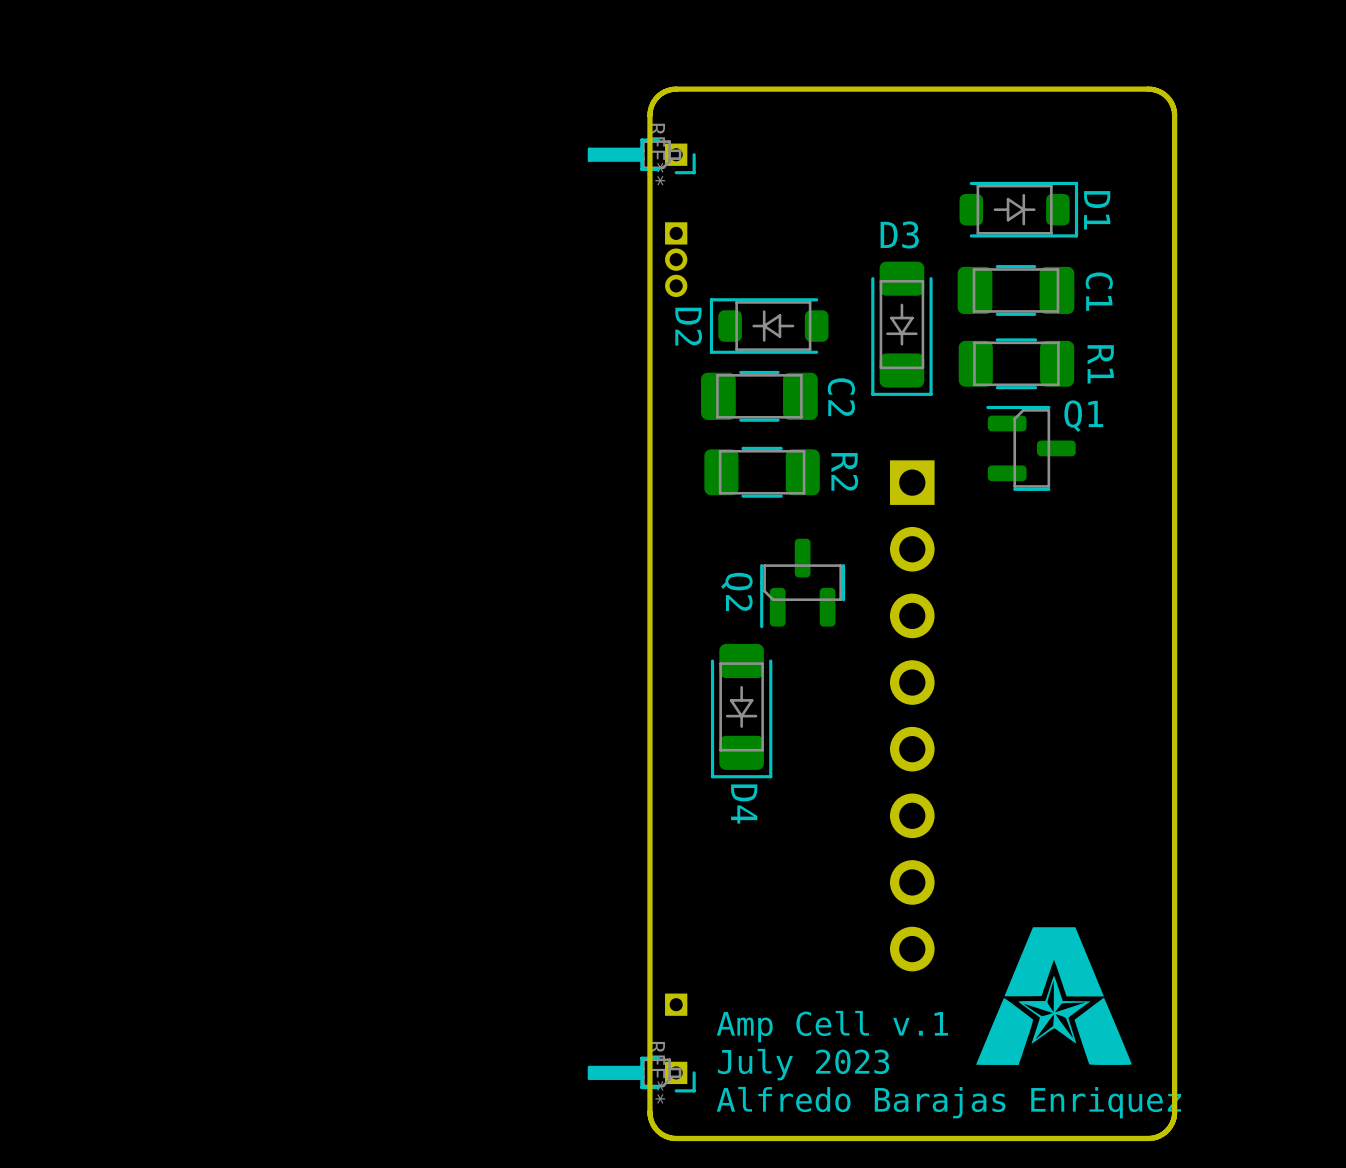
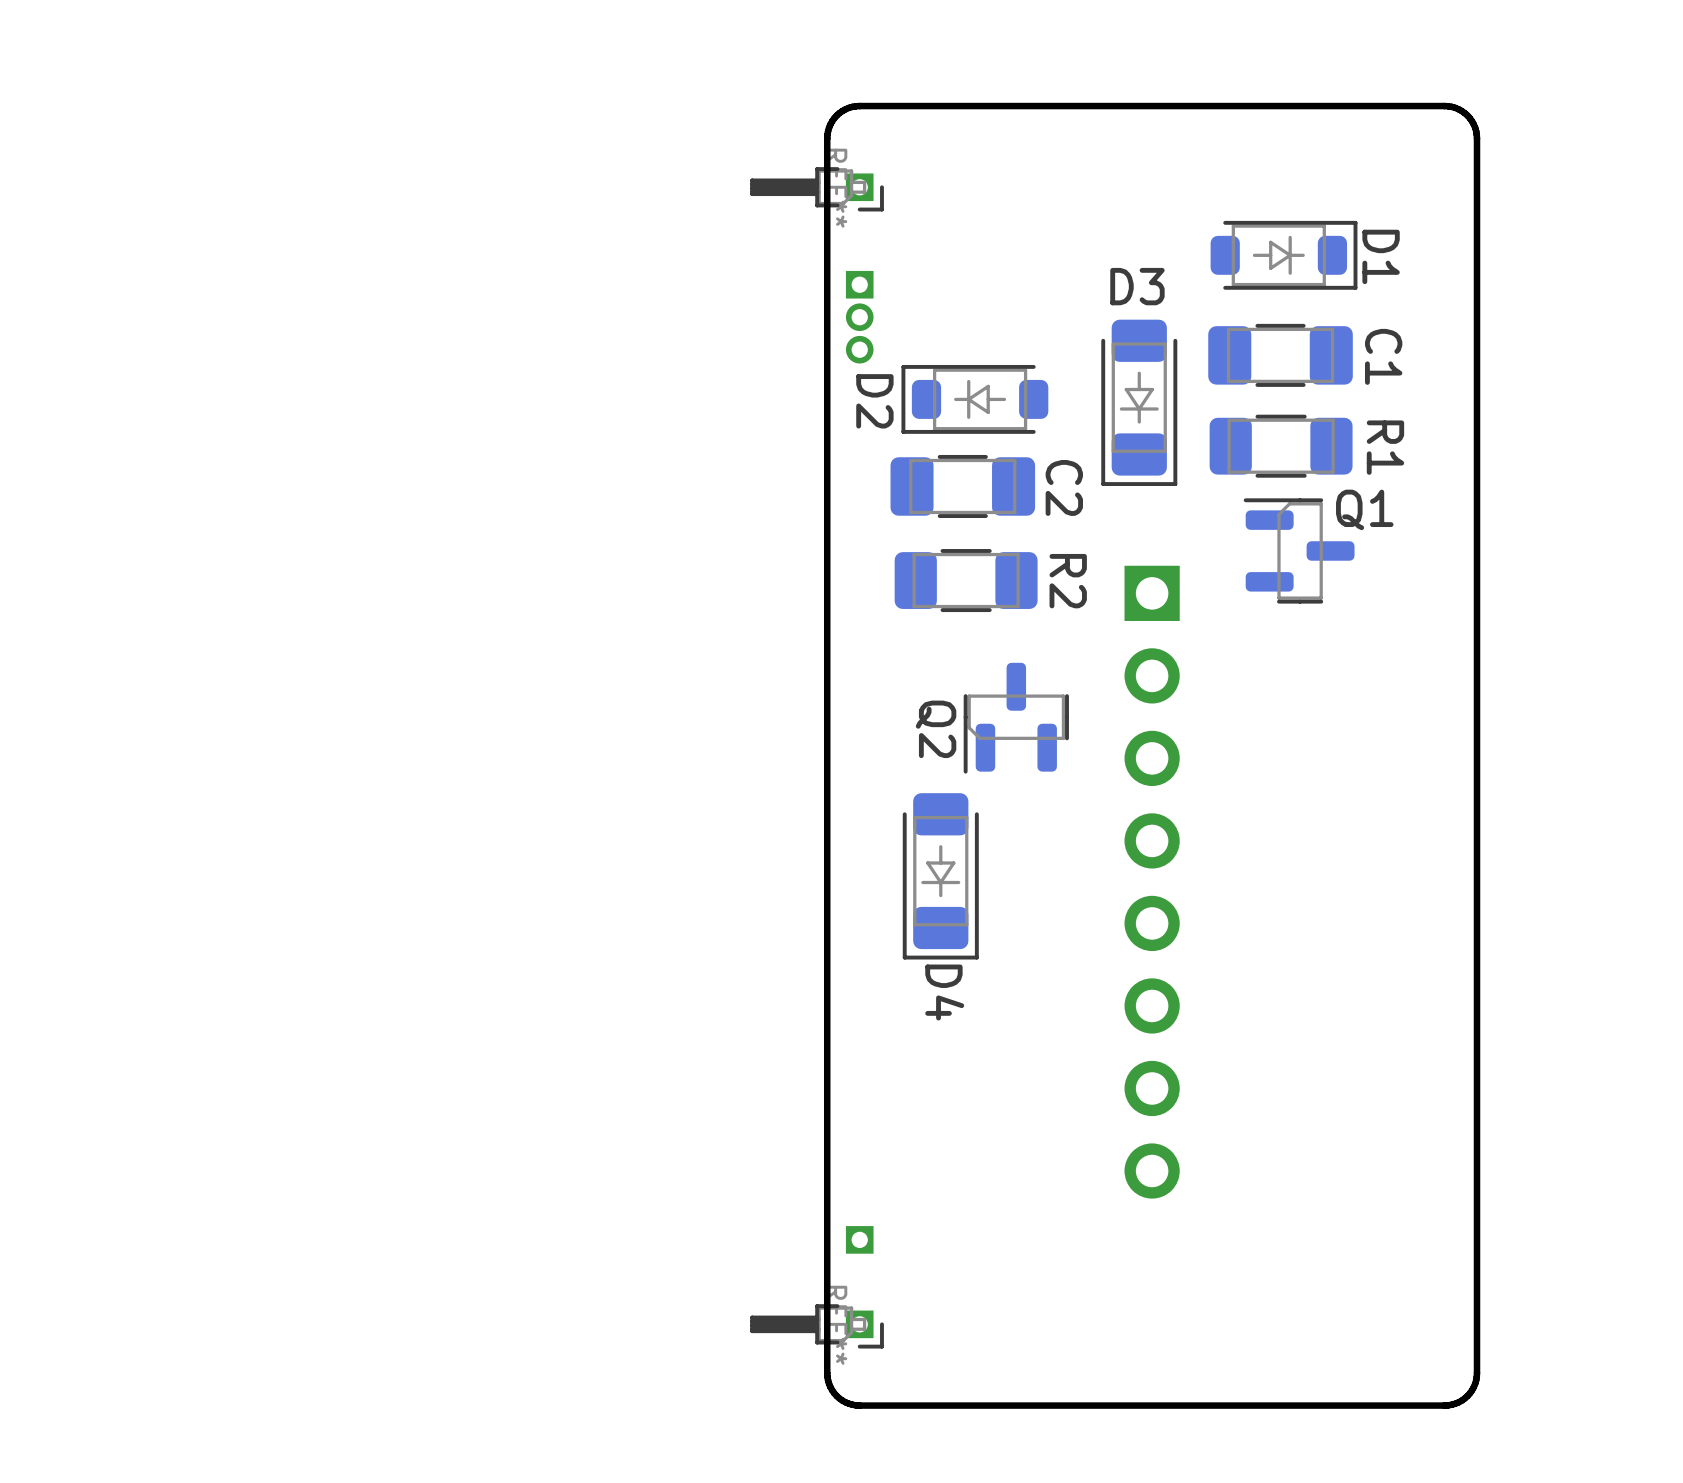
drawing: [976, 927, 1132, 1065] -> none
text: Amp Cell v.1 (832, 1026) -> none
text: July 2023 (803, 1064) -> none
text: Alfredo Barajas Enriquez (948, 1102) -> none

